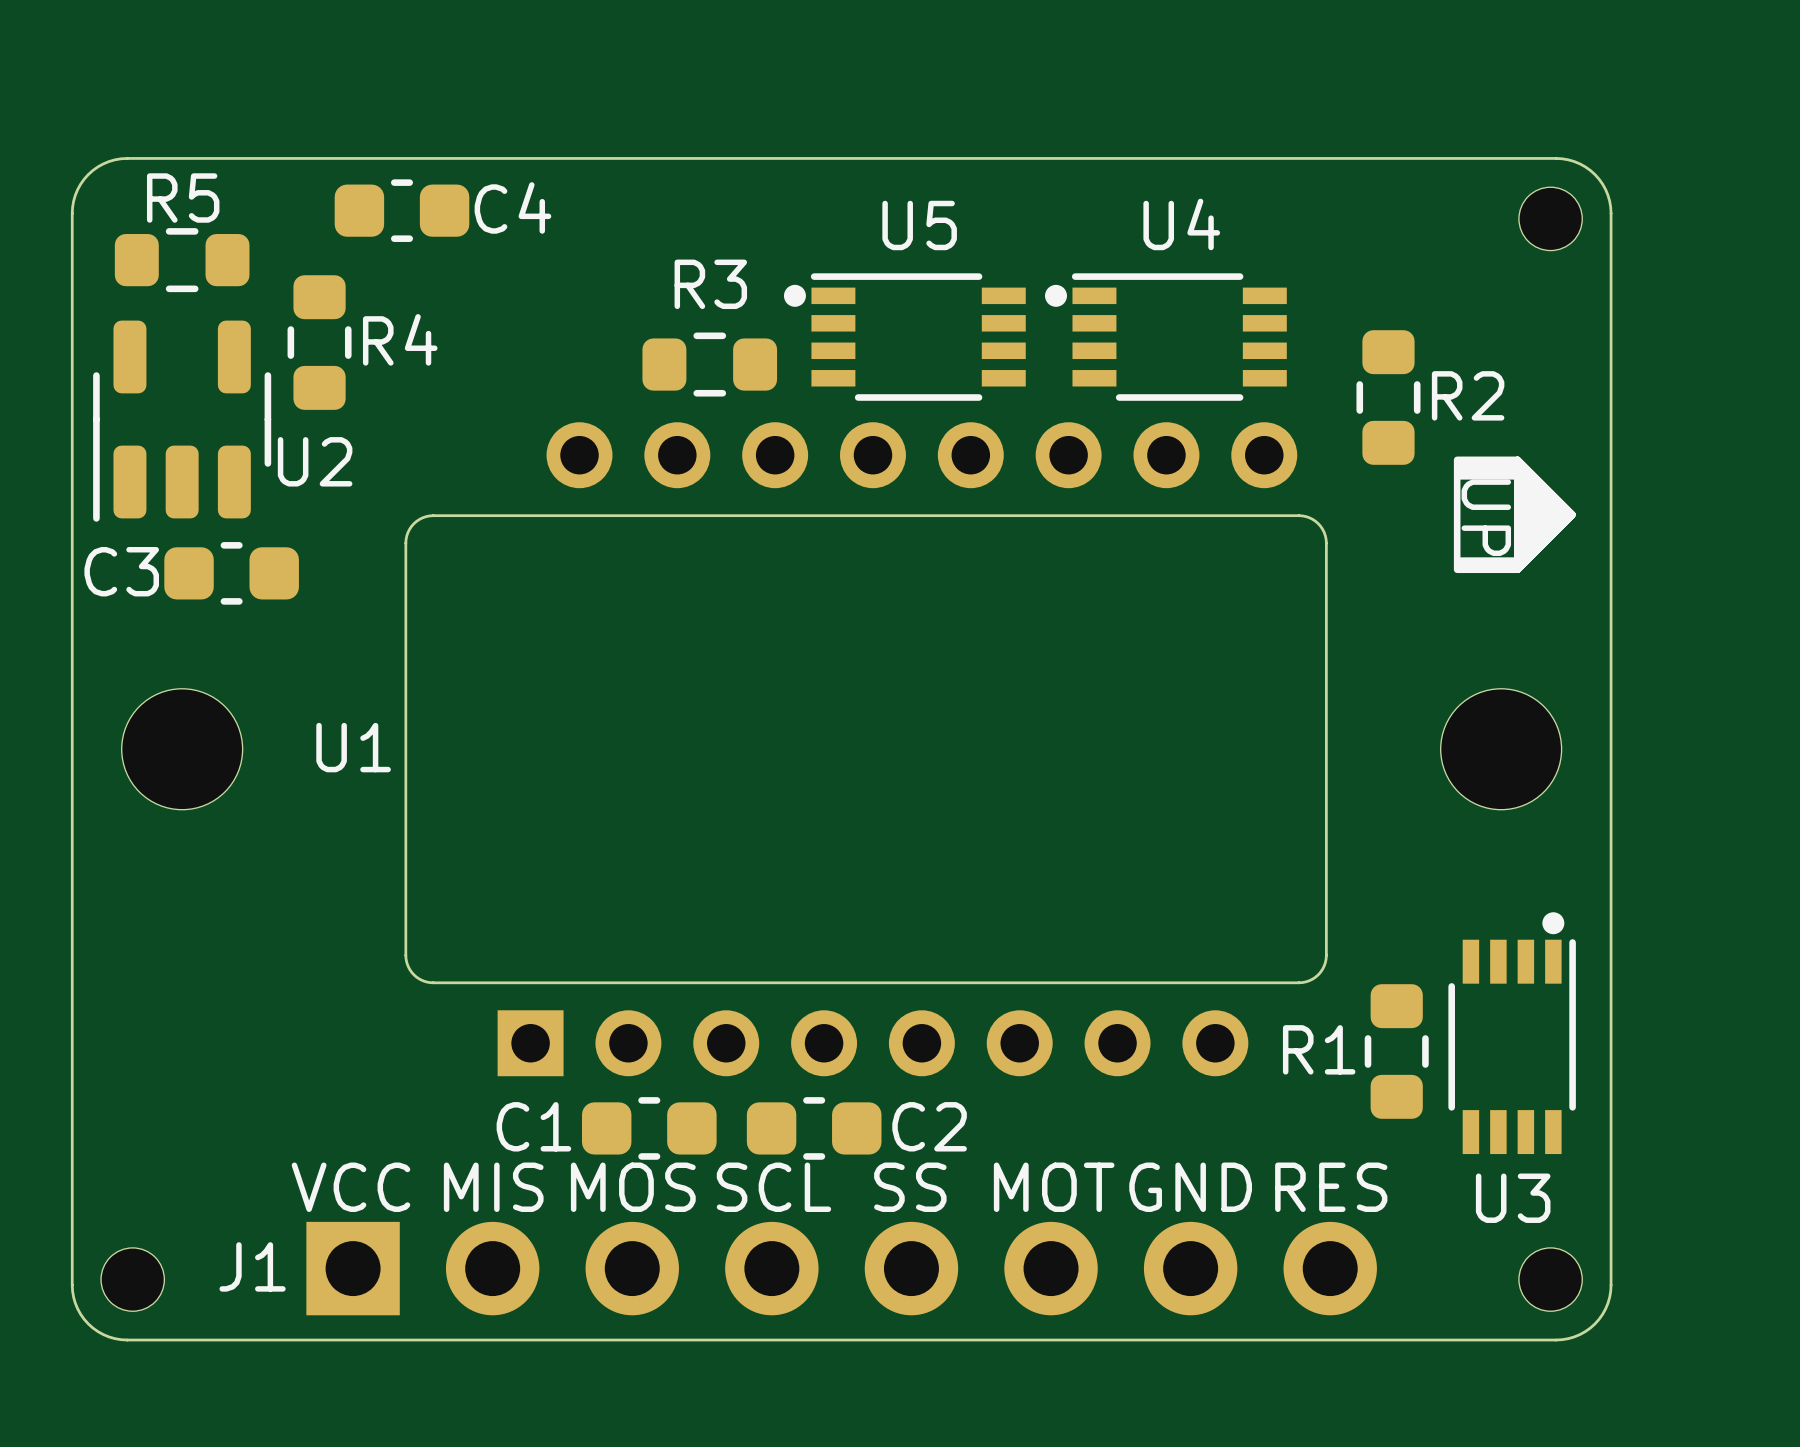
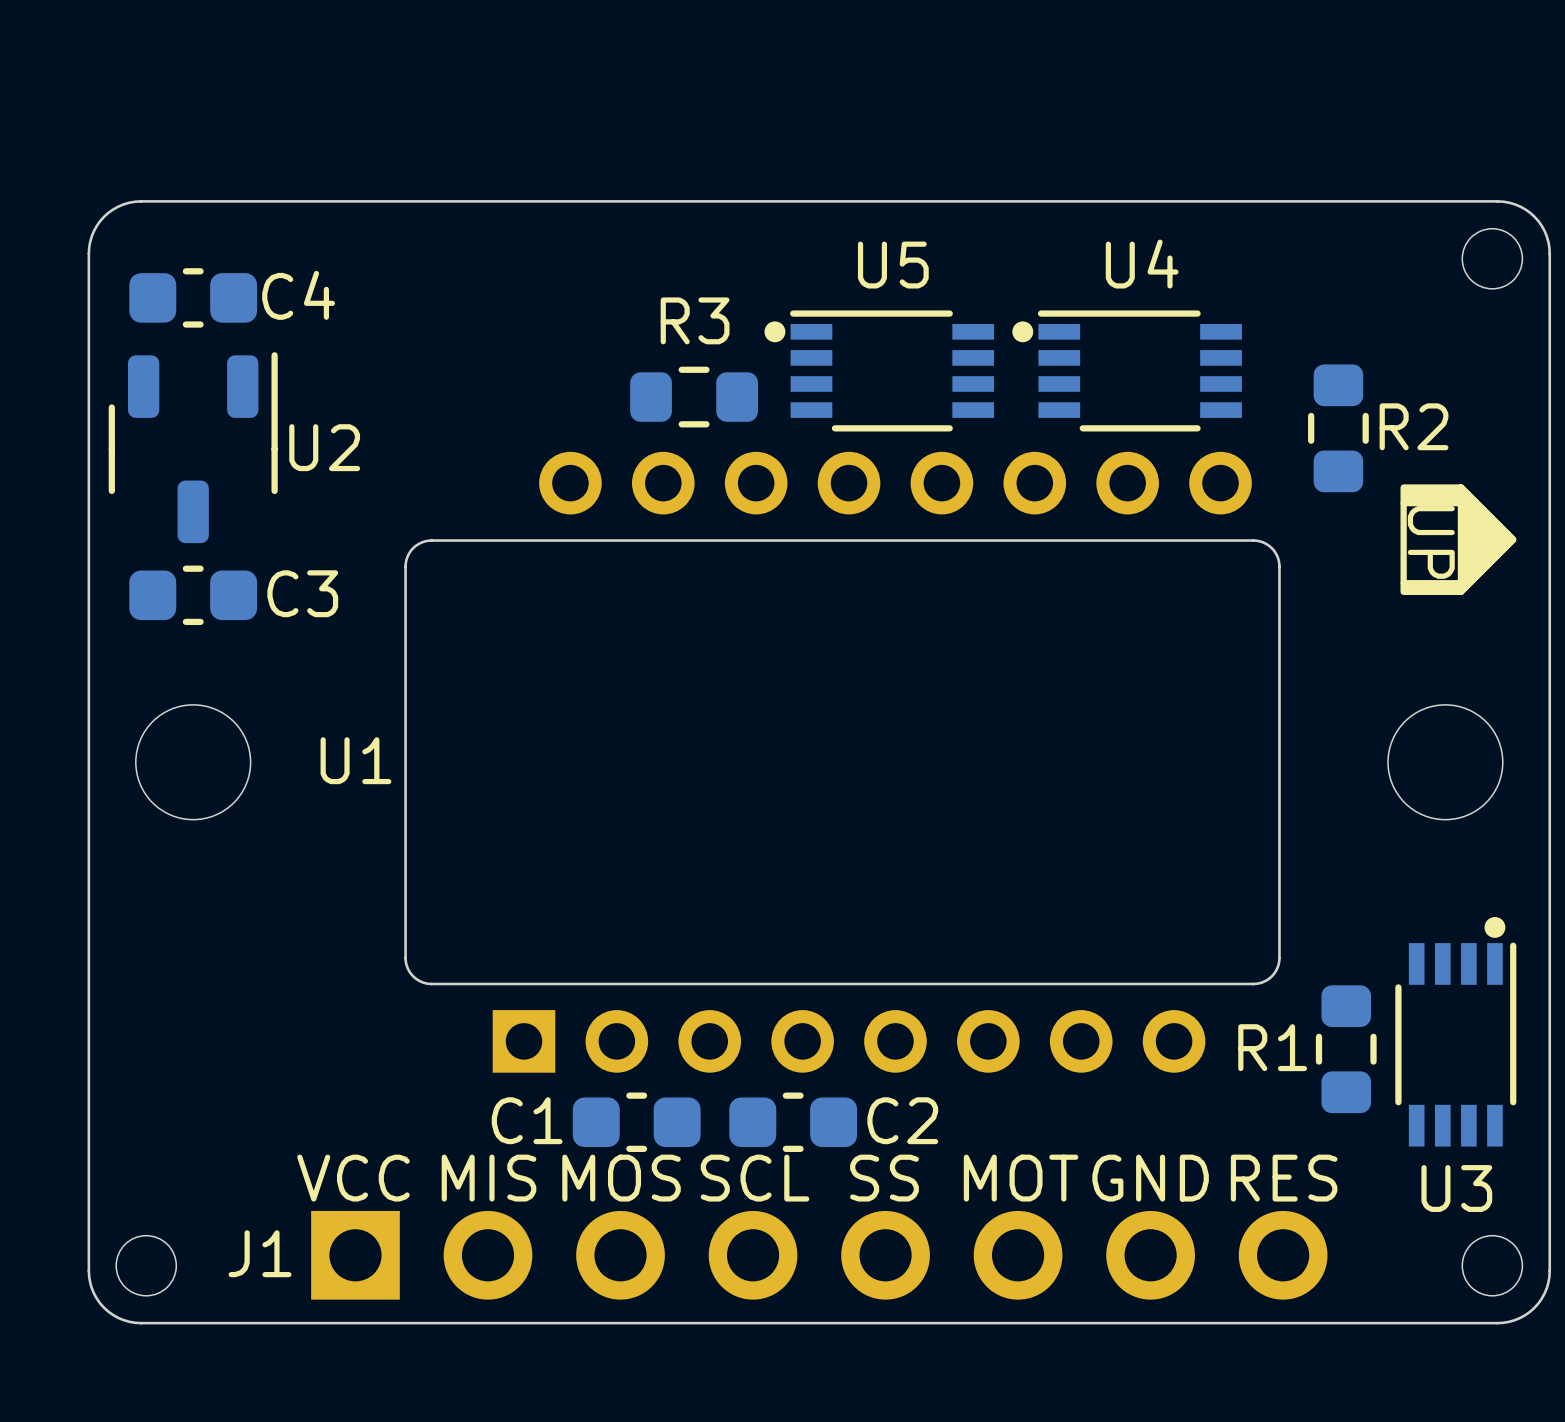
C4 position: (401, 210) -> (193, 297)
R5: (182, 260) -> none
U2 footprint: [93, 320, 272, 522] -> [108, 352, 278, 544]
R4: (319, 342) -> none
U2 name position: U2 (315, 461) -> U2 (324, 447)
C3 name position: C3 (121, 571) -> C3 (302, 593)
C3 position: (231, 573) -> (193, 595)

